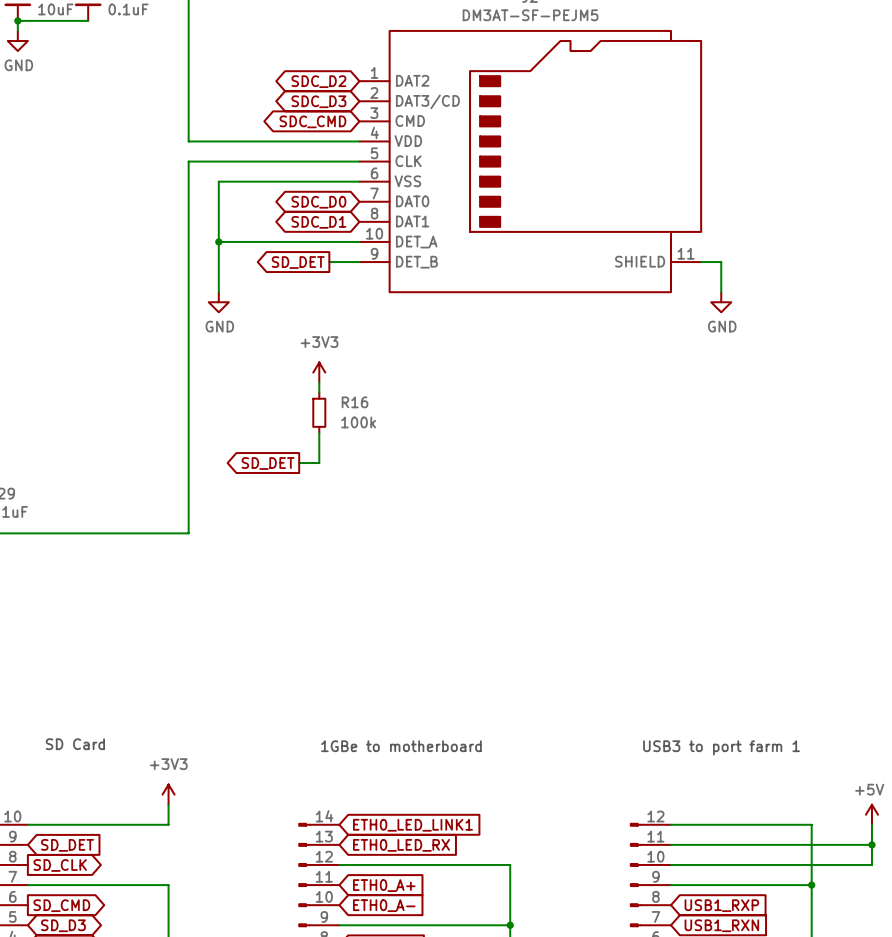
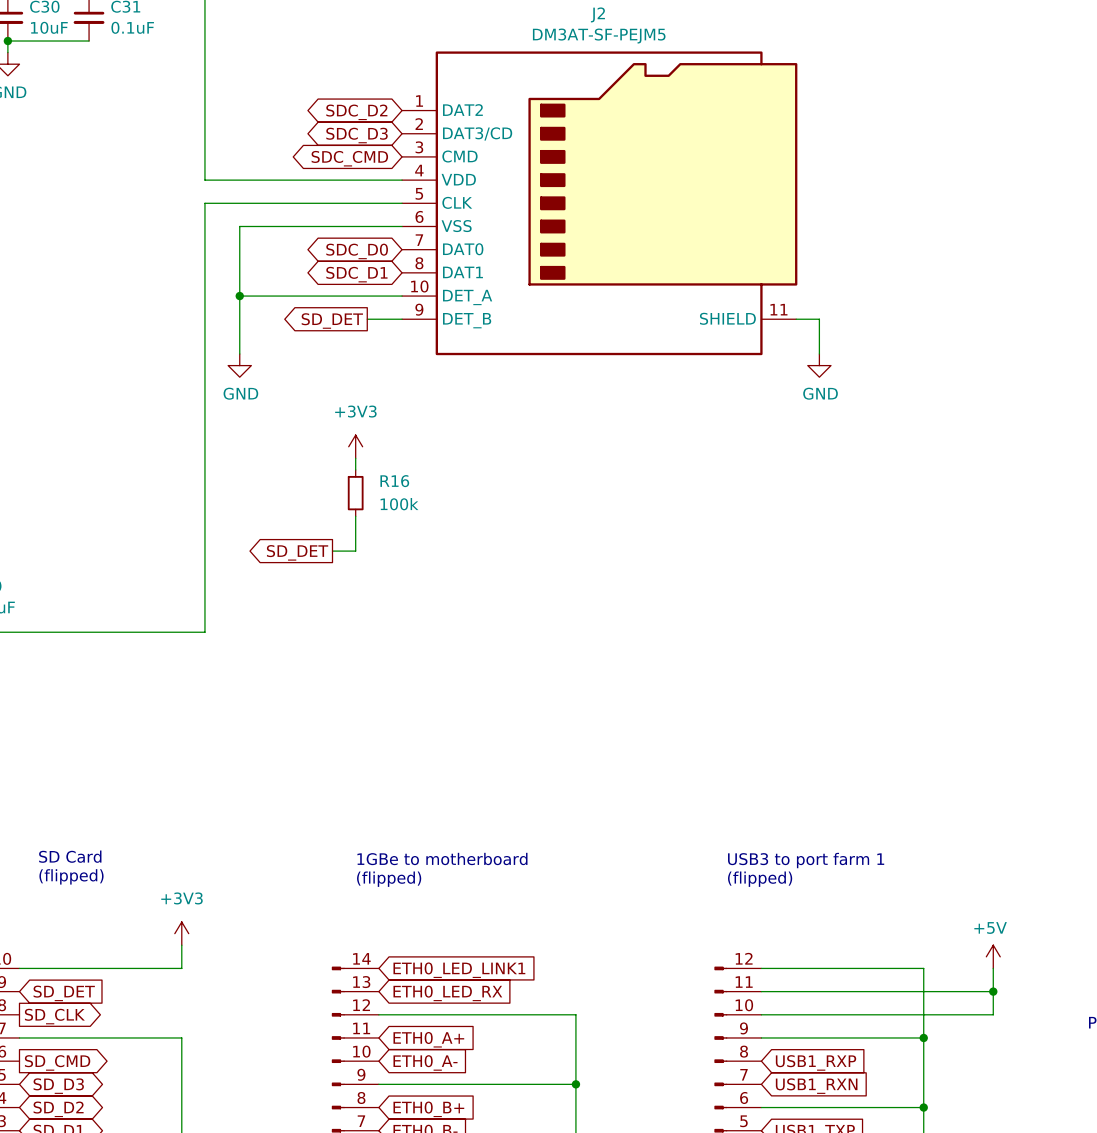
text: none -> SD Card (70, 856)
text: none -> 1GBe to motherboard (442, 858)
text: none -> USB3 to port farm 1 (806, 860)
text: SD Card (75, 744) -> (flipped) (71, 876)
text: 1GBe to motherboard (401, 746) -> (flipped) (389, 879)
text: USB3 to port farm 1 (721, 747) -> (flipped) (760, 879)

